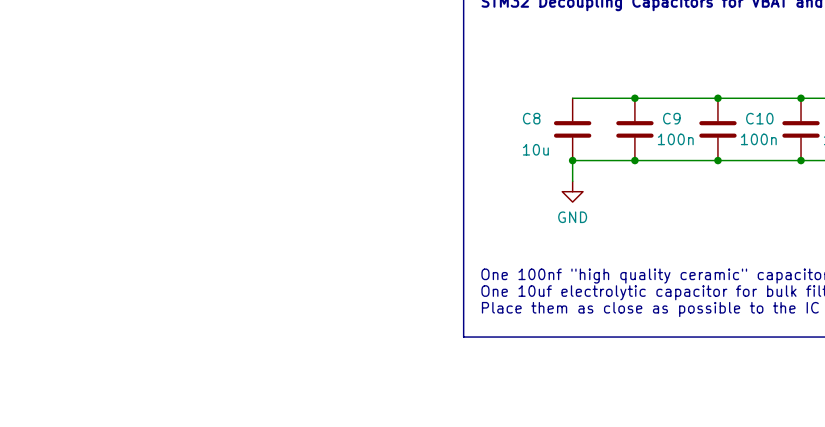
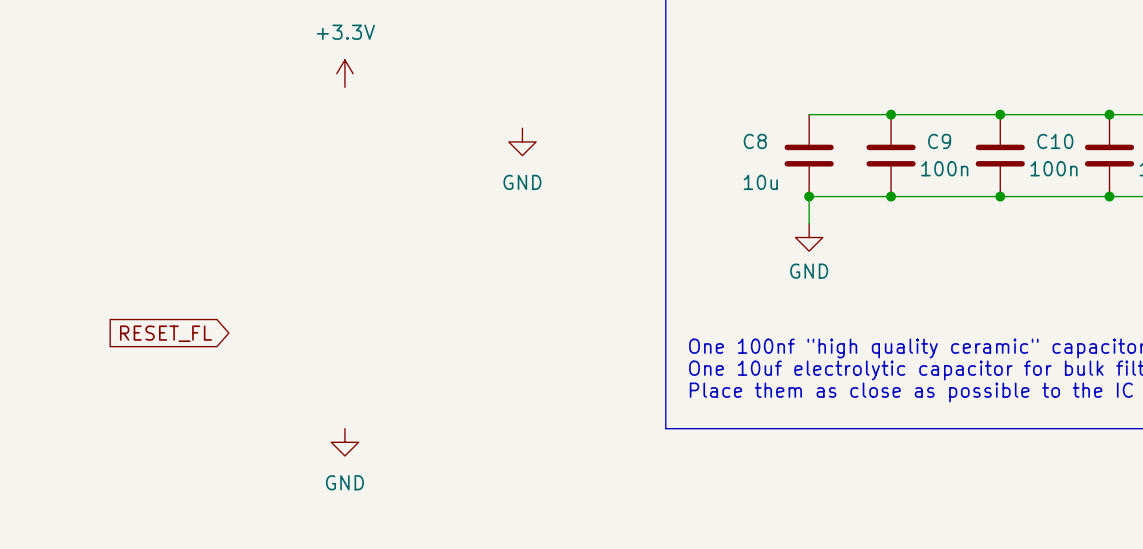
power symbol: none -> +3.3V (344, 73)
power symbol: none -> GND (522, 141)
global label: none -> RESET_FL (165, 333)
power symbol: none -> GND (344, 442)

